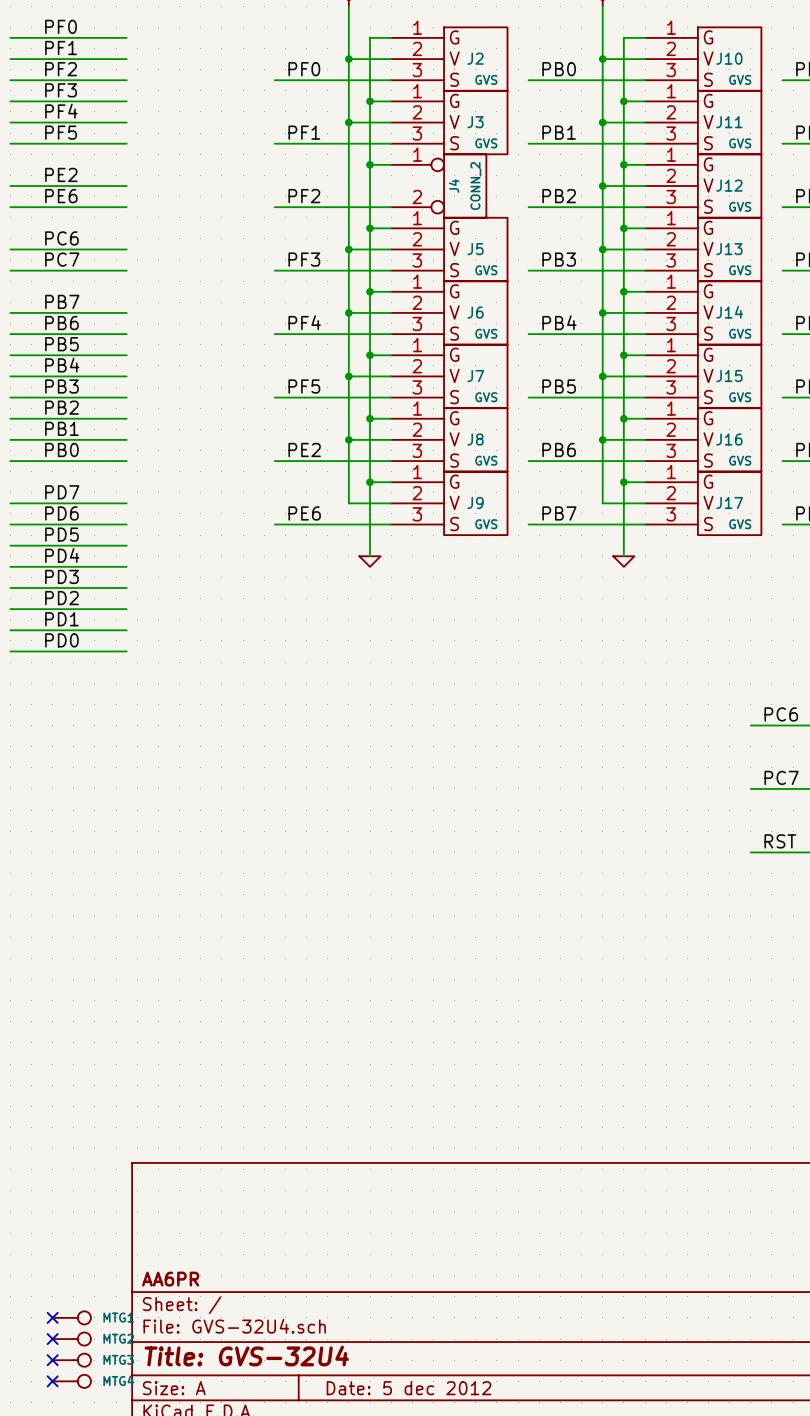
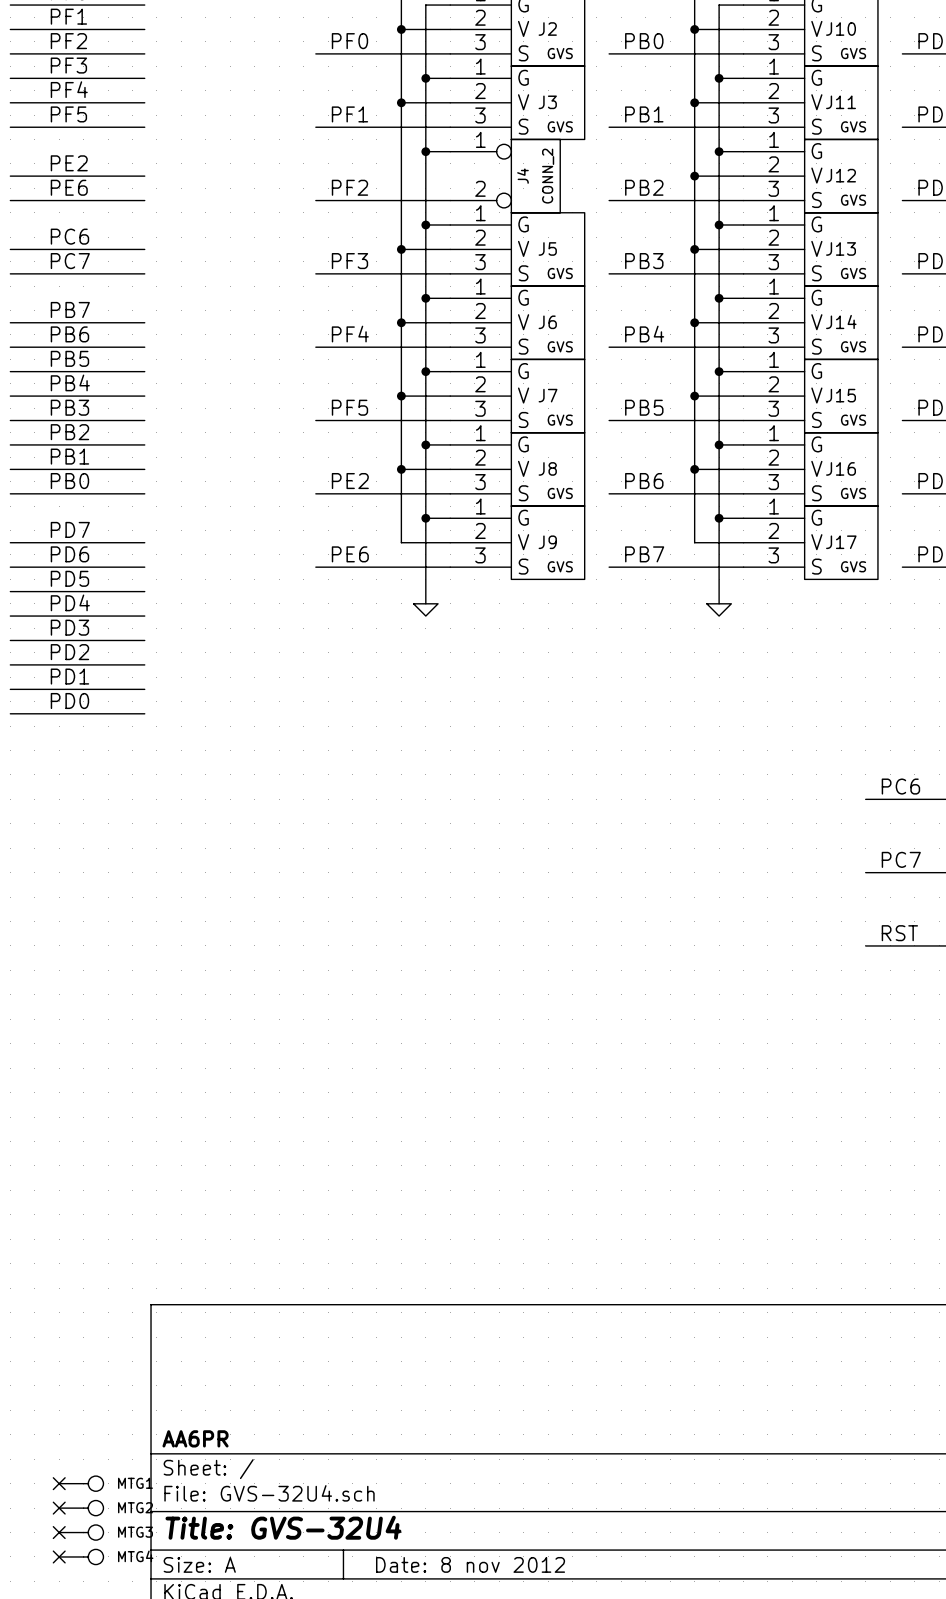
title block: Date: 5 dec 2012 (409, 1388) -> Date: 8 nov 2012 (470, 1564)

